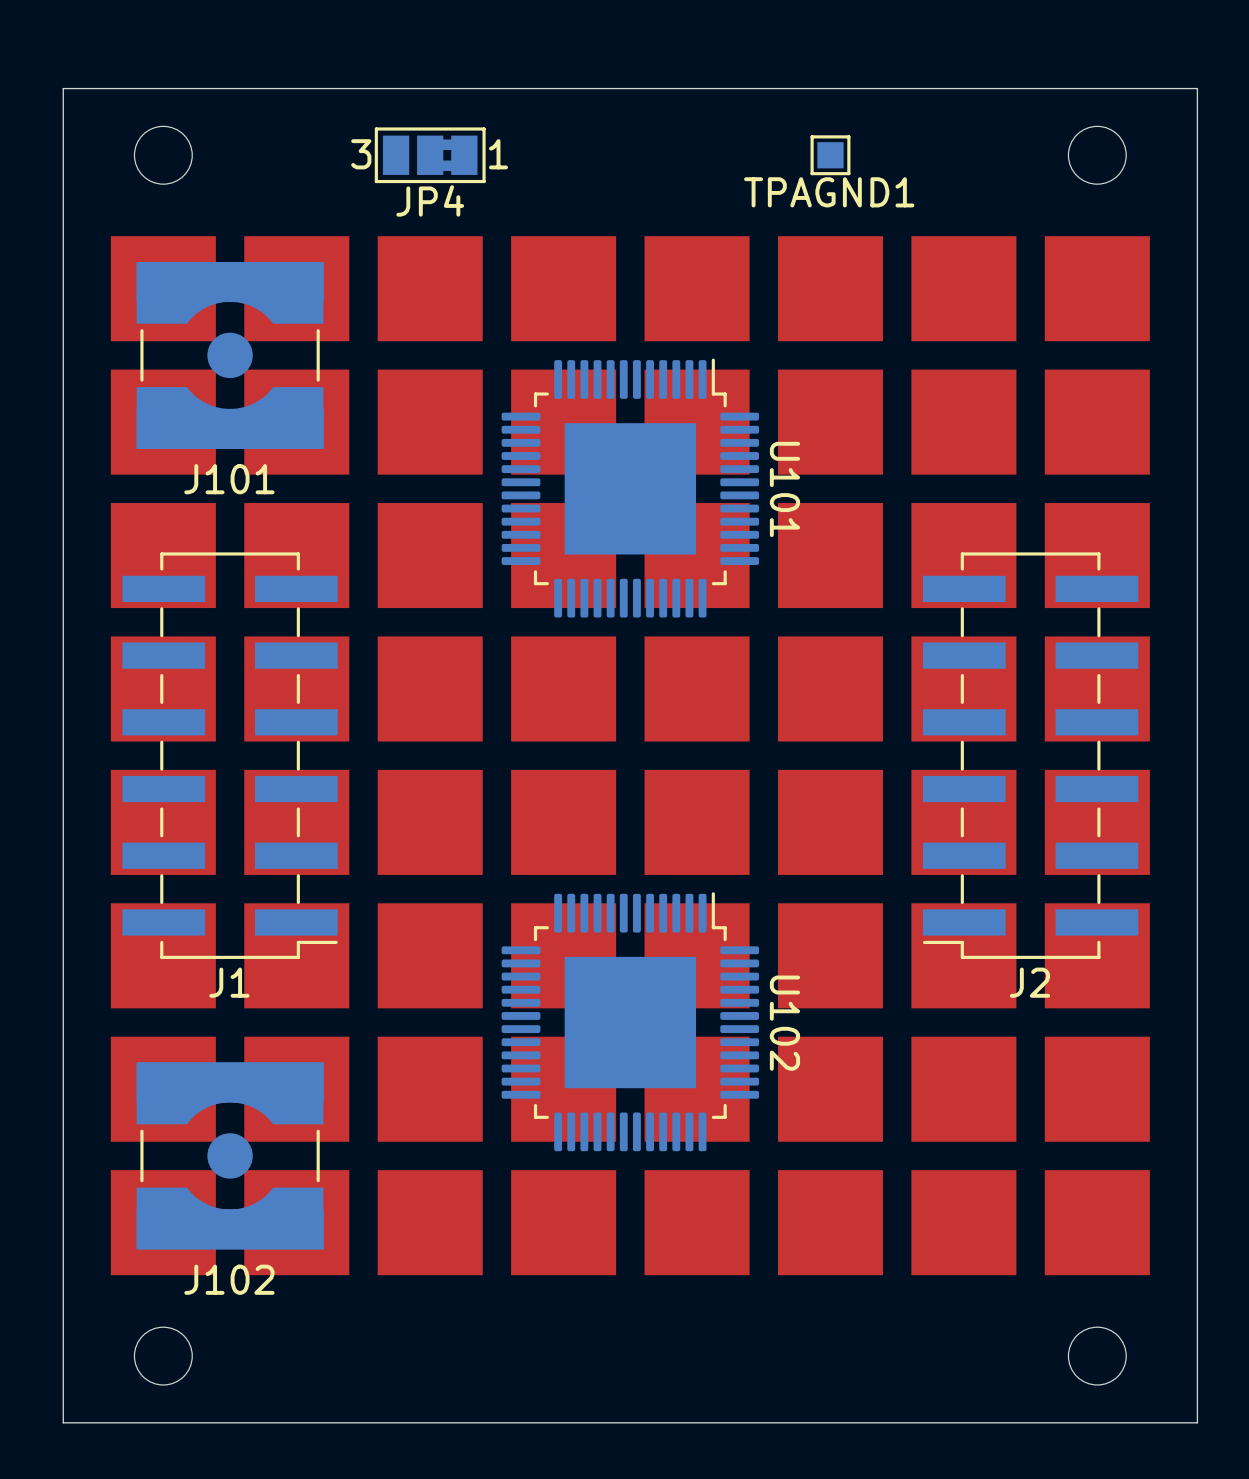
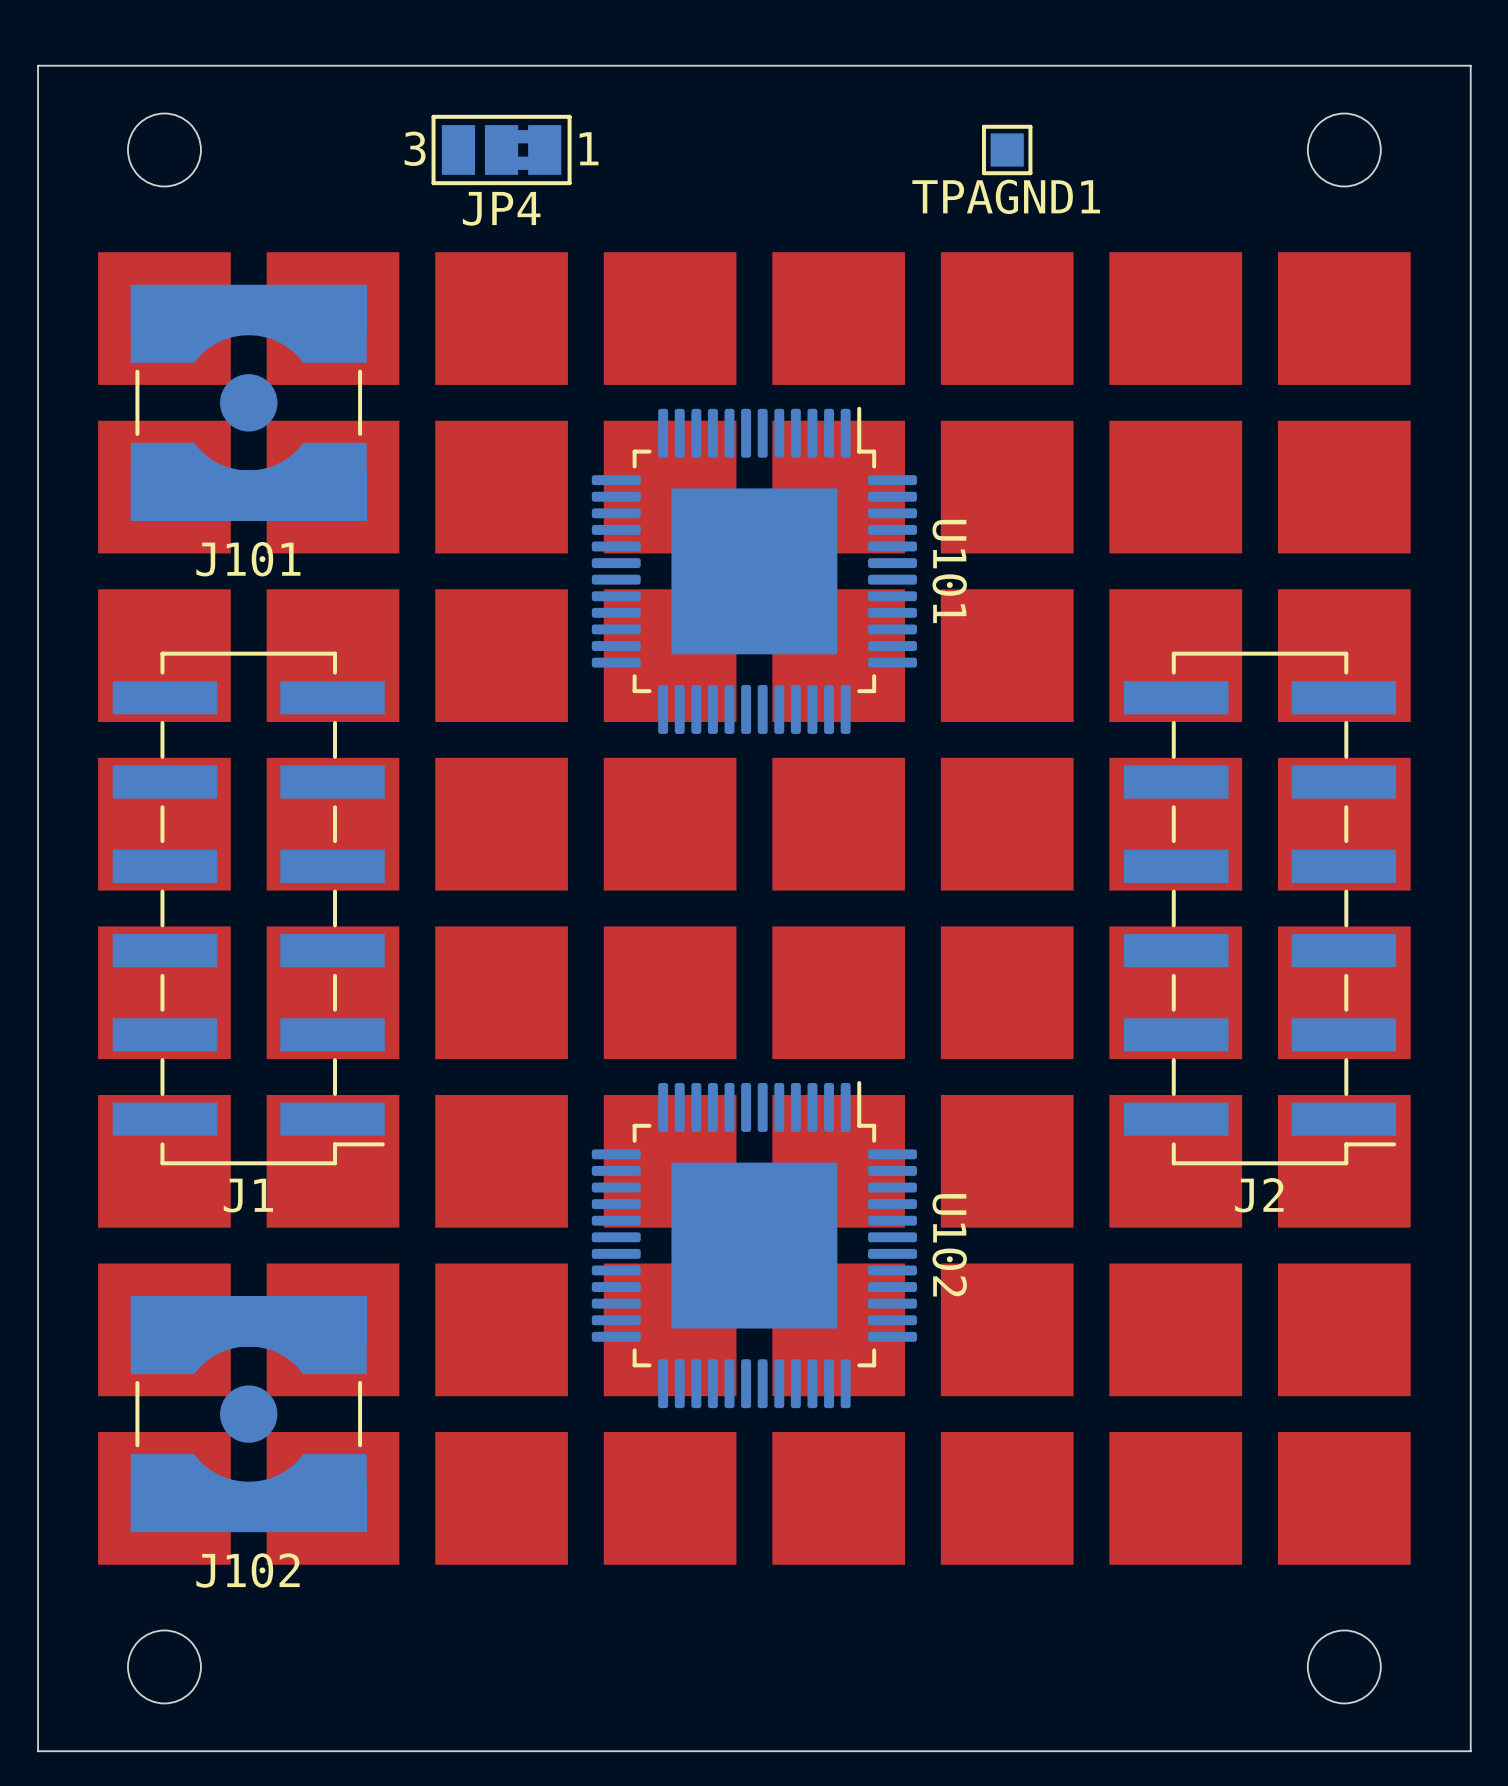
J2 footprint: [922, 552, 1139, 959] -> [1124, 651, 1397, 1166]

